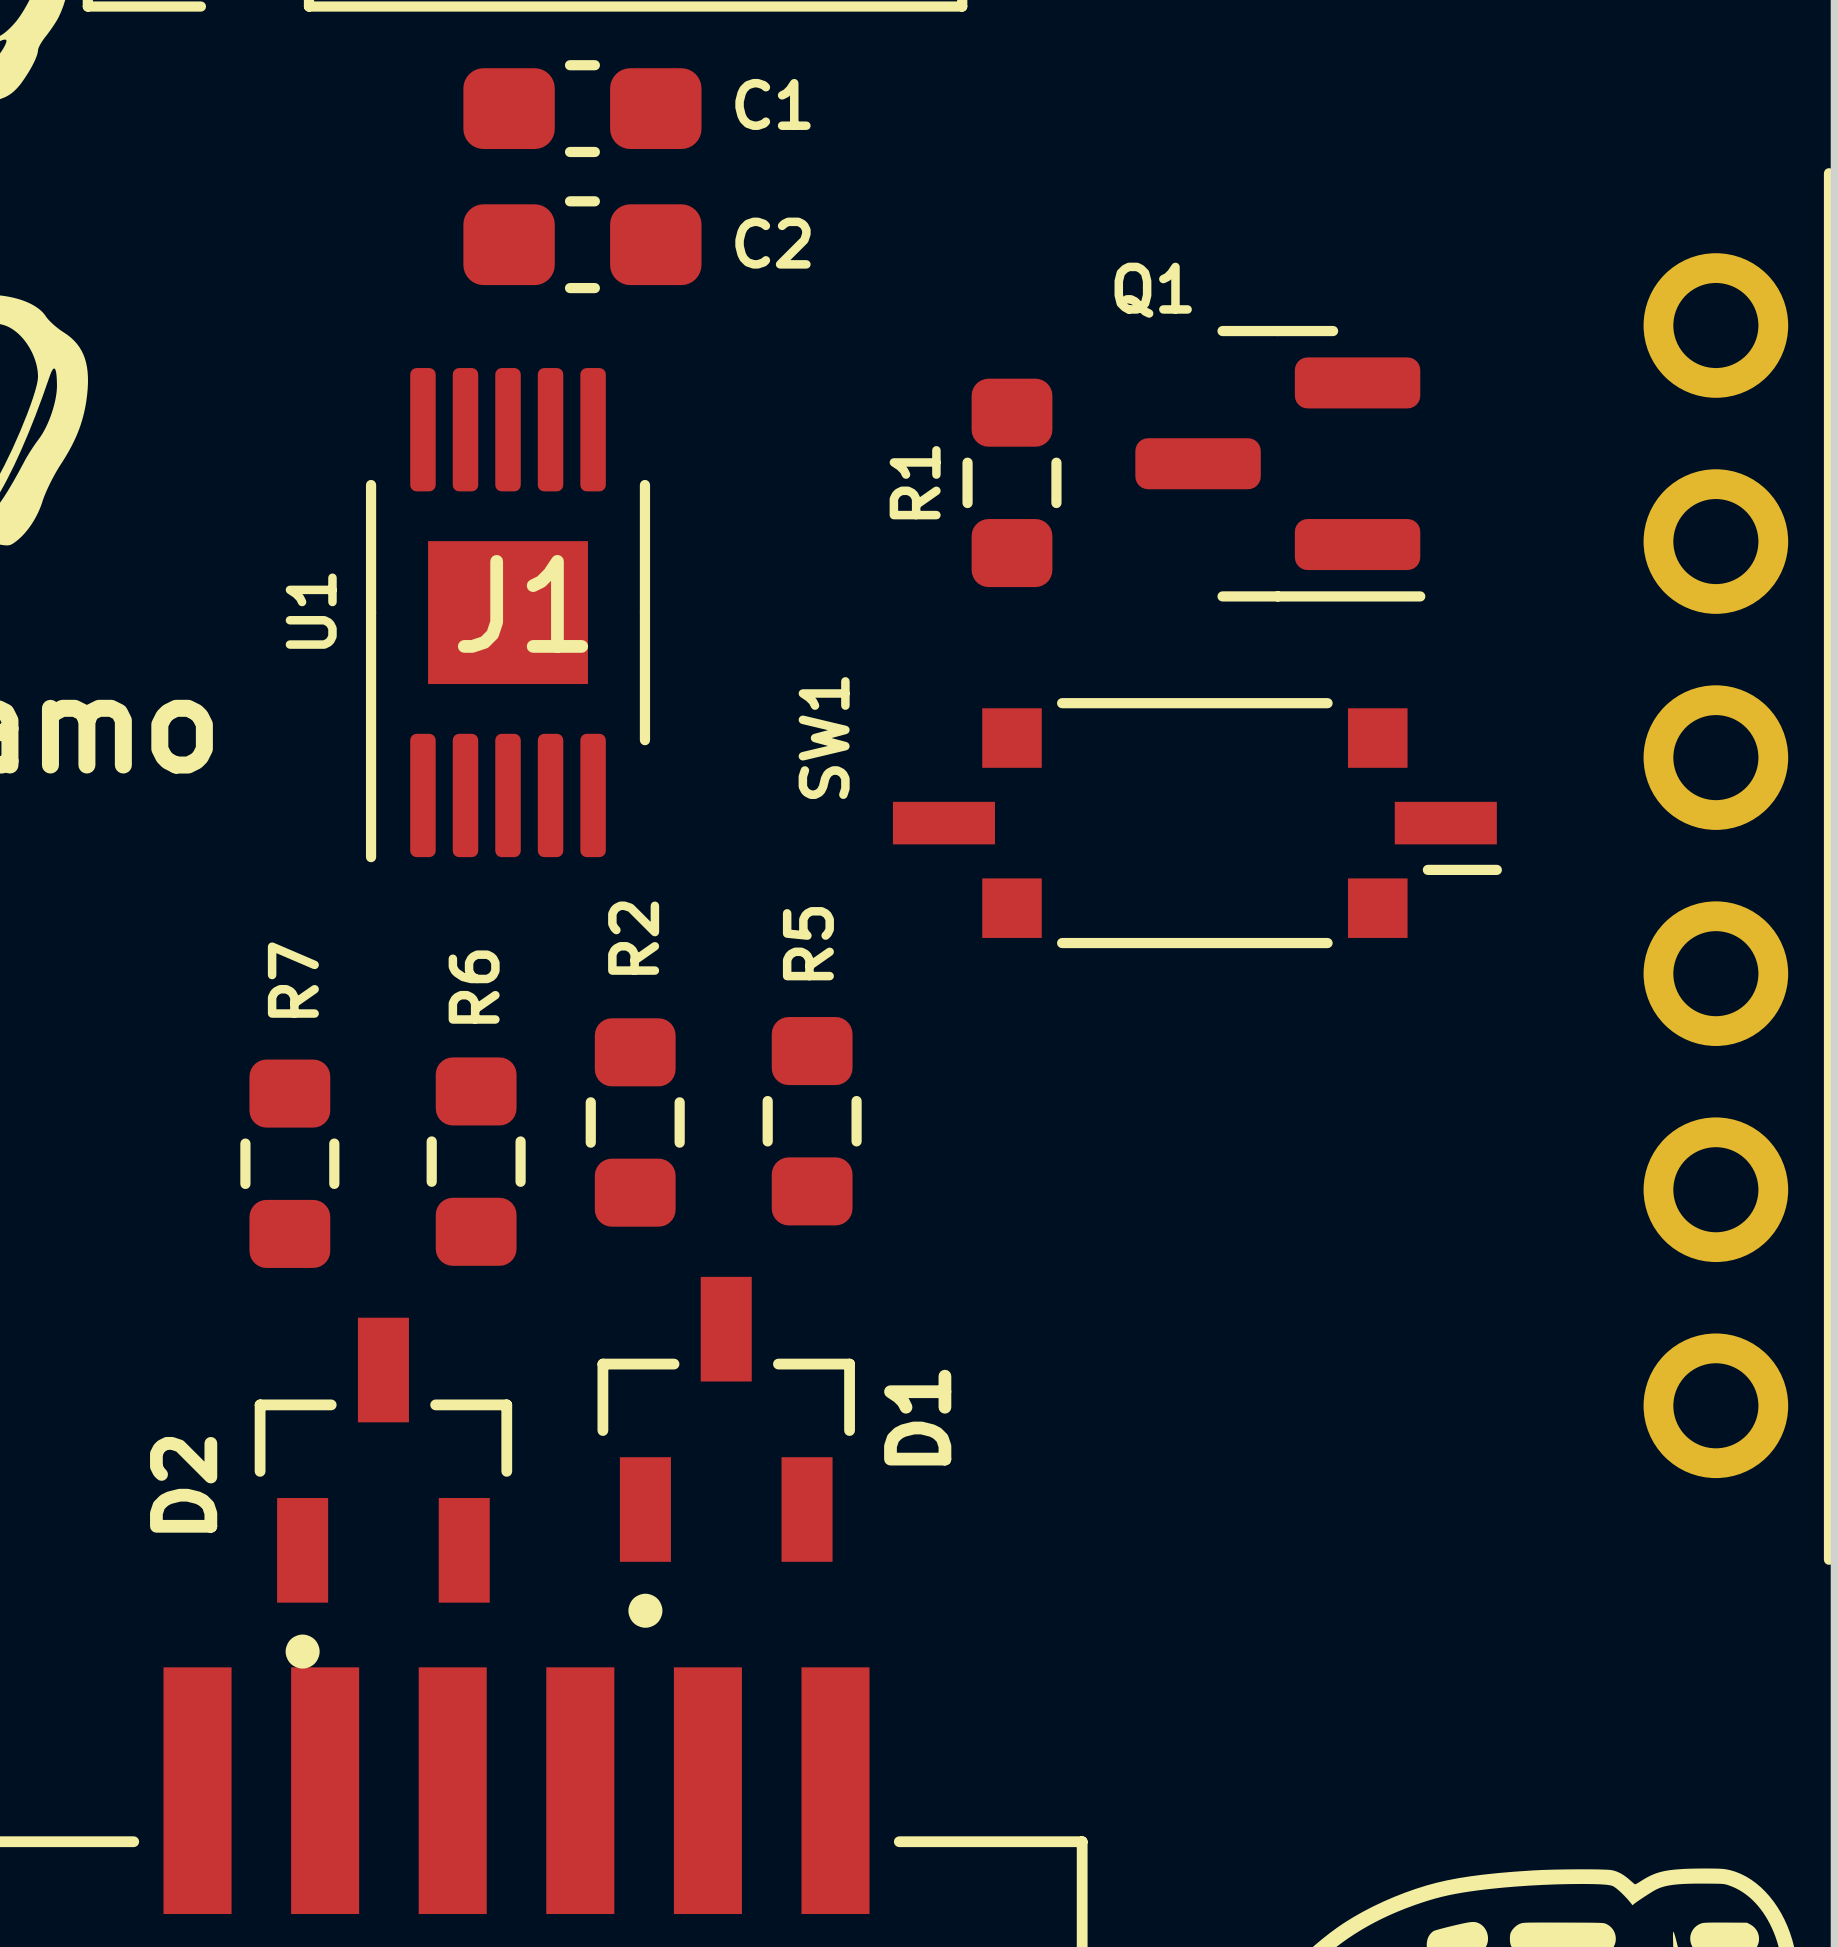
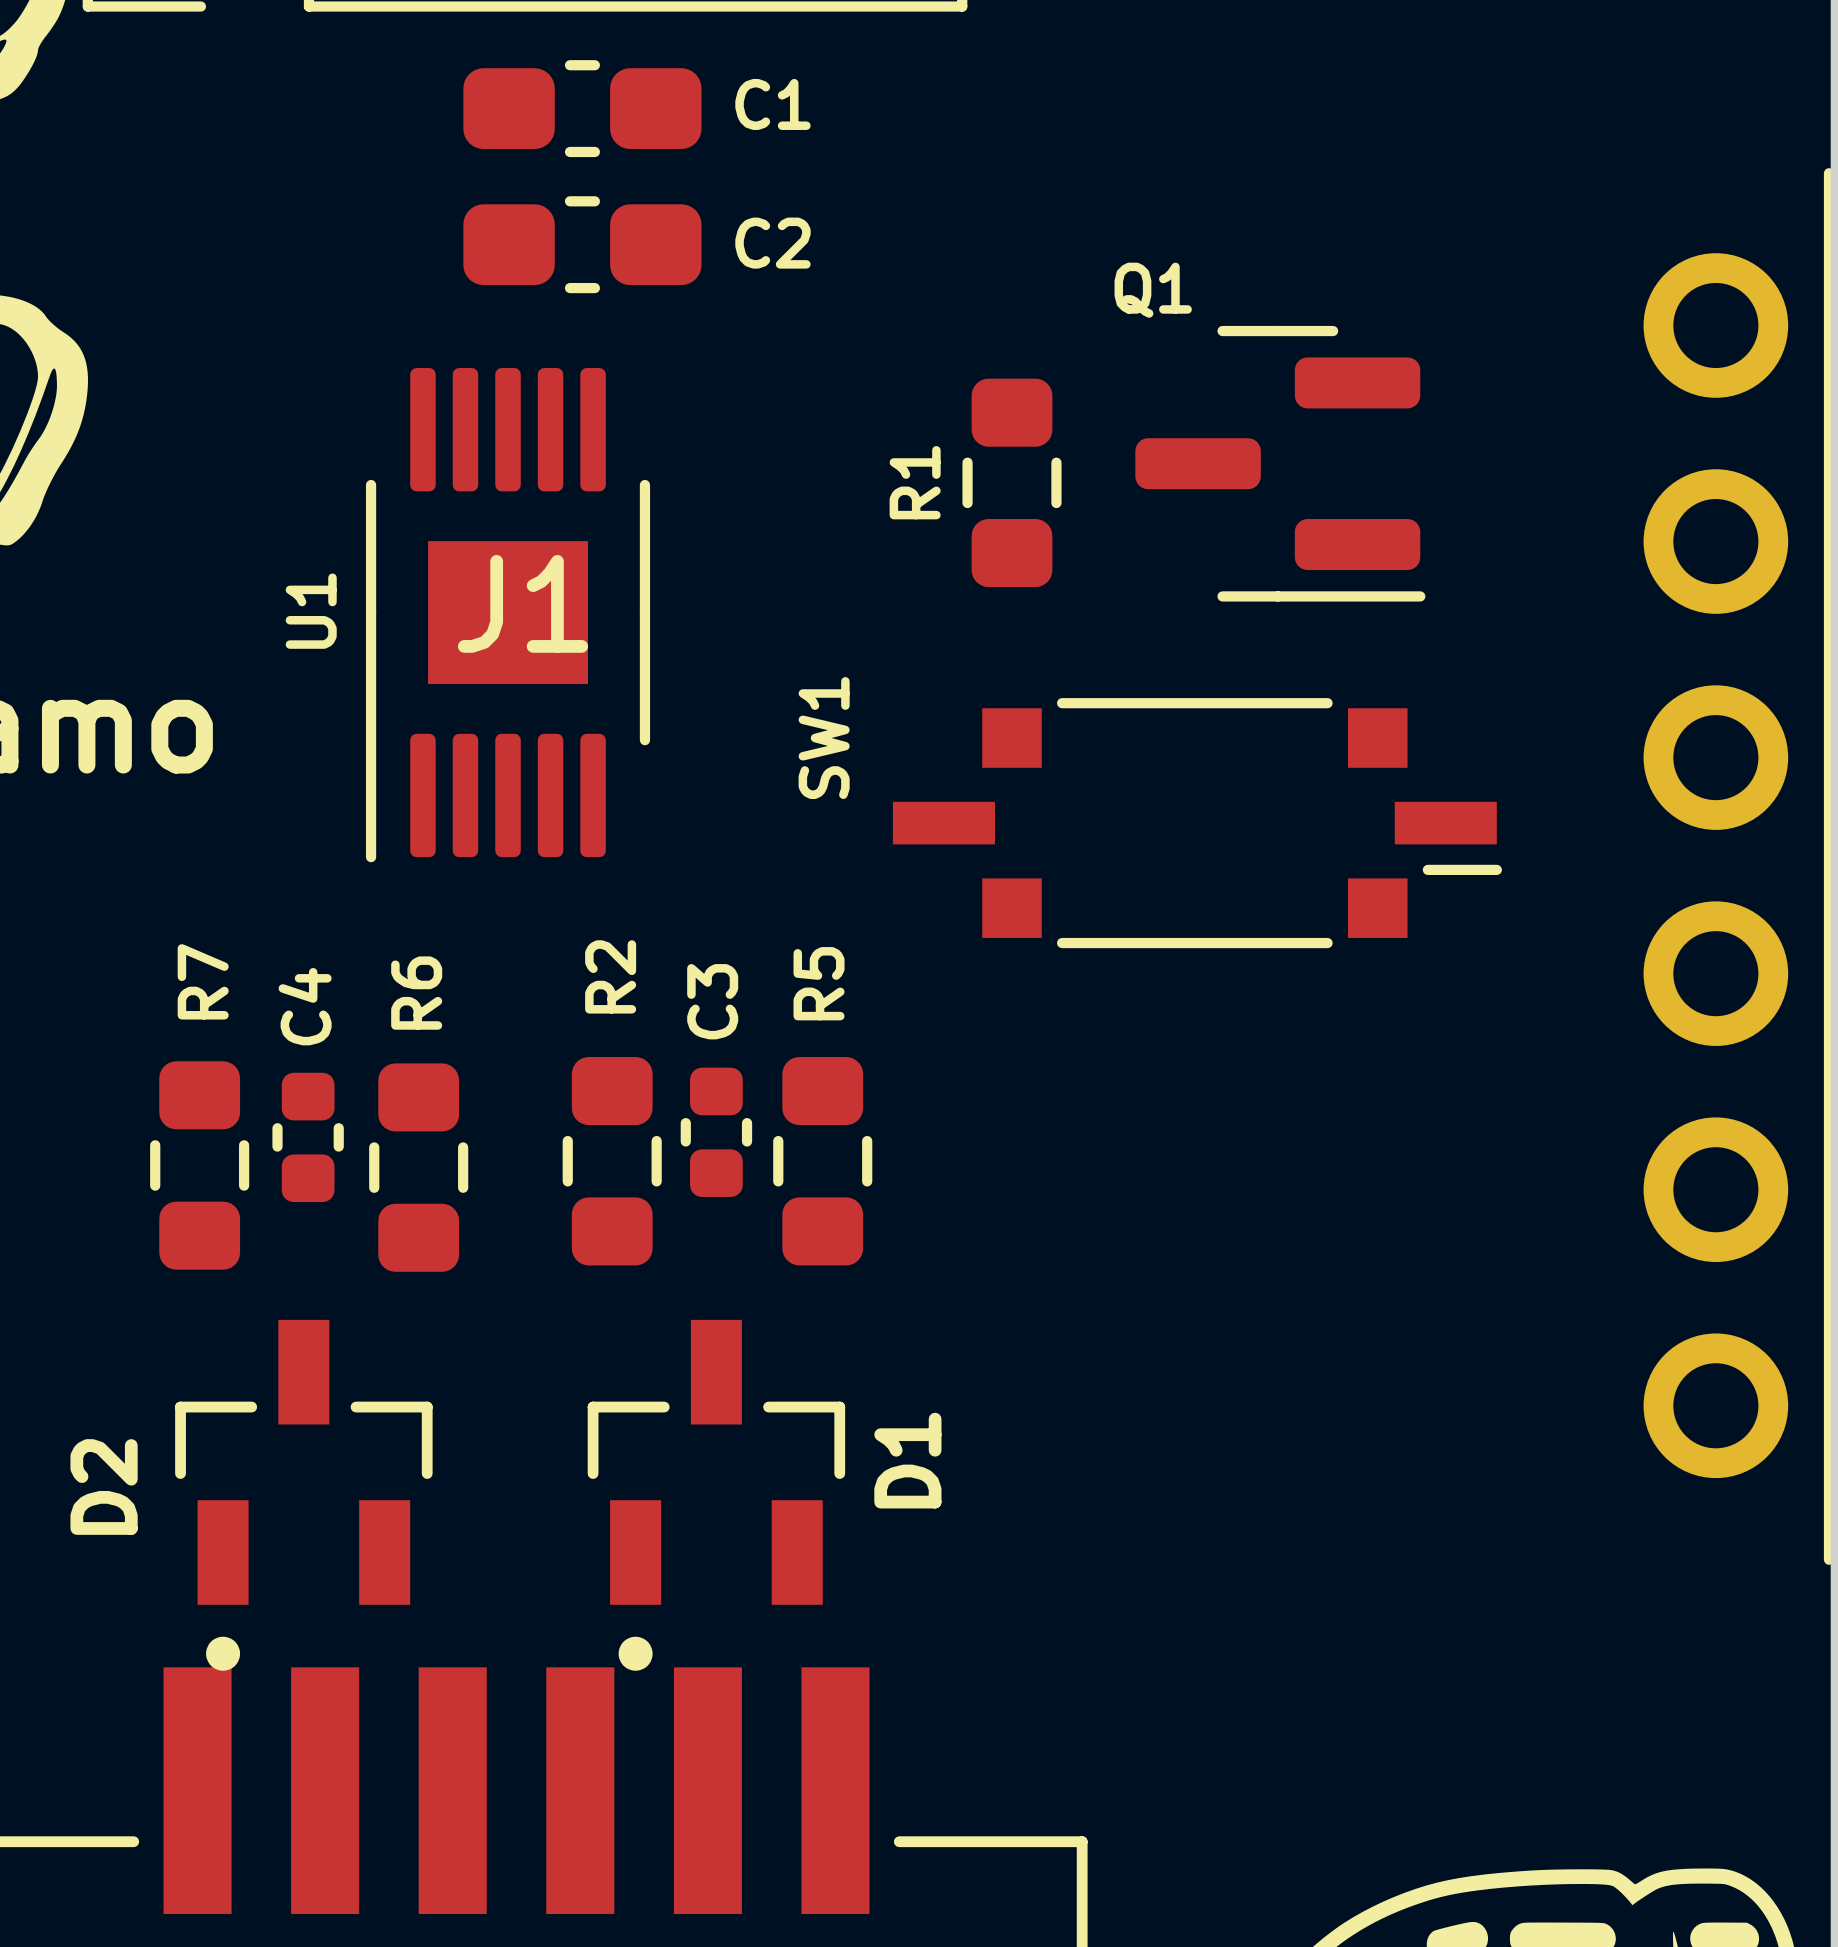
R5 position: (812, 1121) -> (822, 1161)
R2 position: (635, 1122) -> (612, 1161)
C3: none -> (716, 1132)
C4: none -> (308, 1137)
R6 position: (476, 1161) -> (418, 1167)
R7 position: (289, 1163) -> (199, 1165)
D1 position: (726, 1452) -> (716, 1495)
D2 position: (383, 1493) -> (303, 1495)

